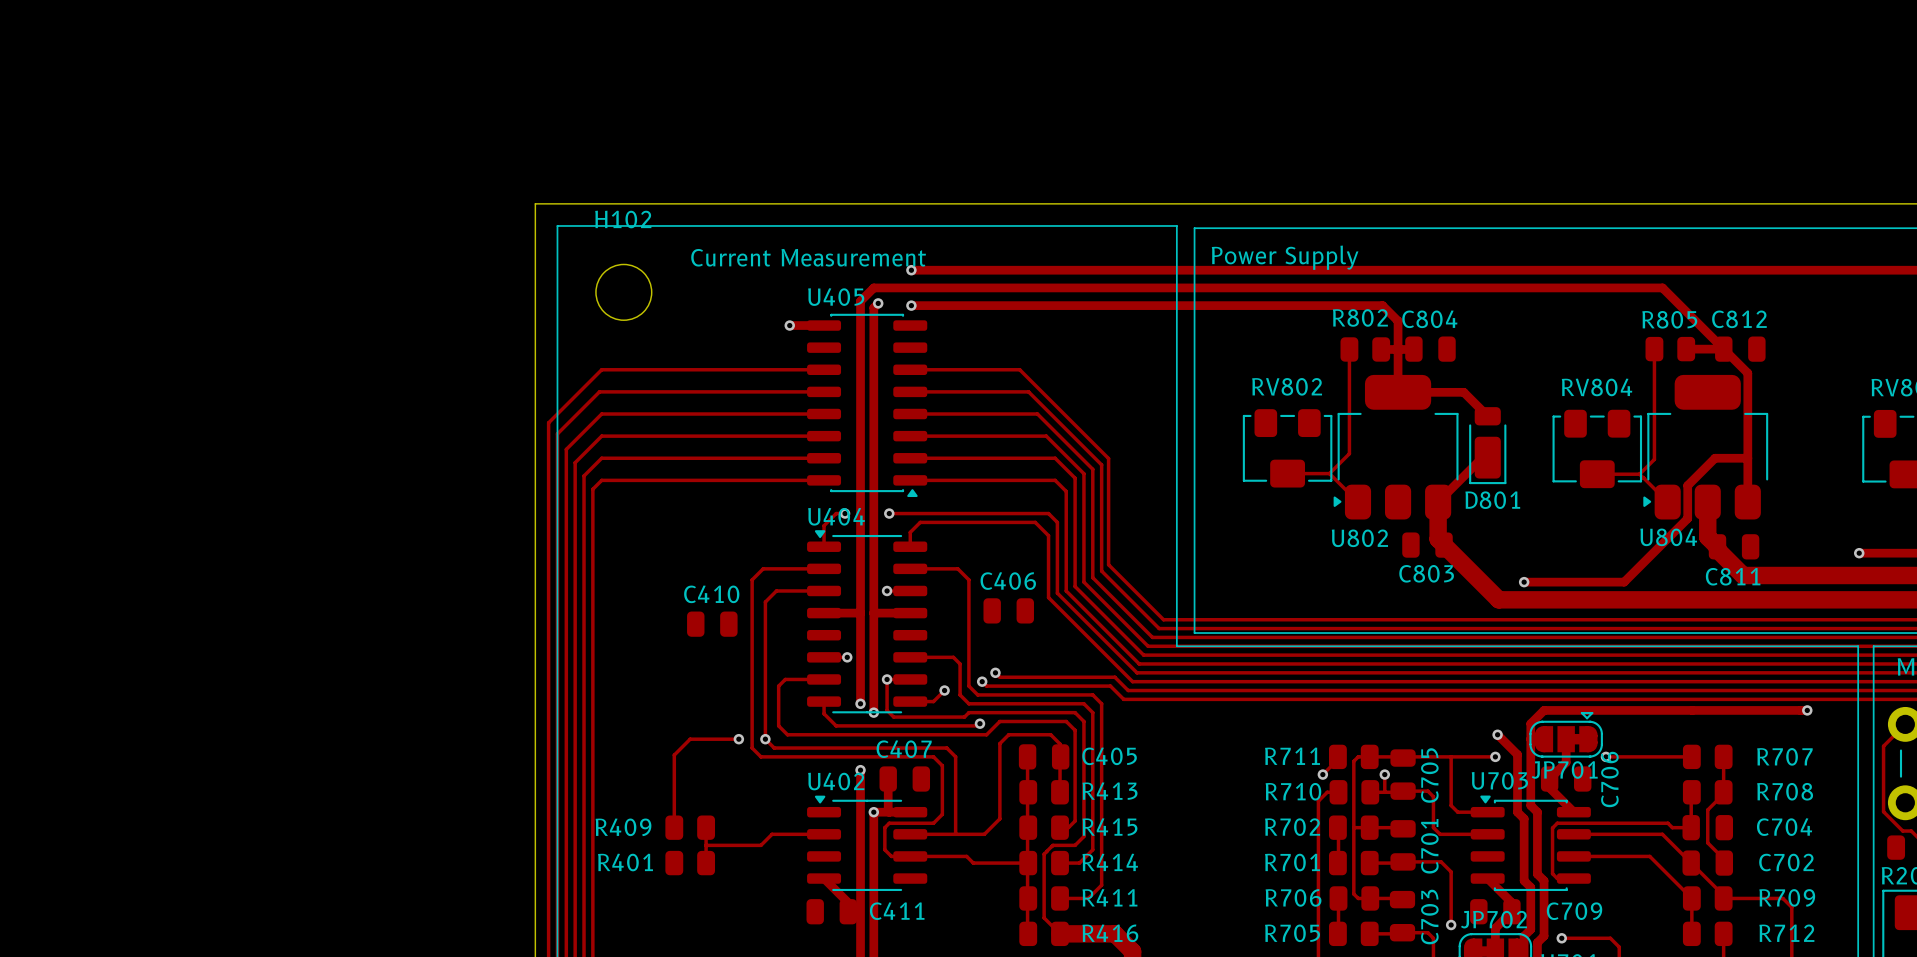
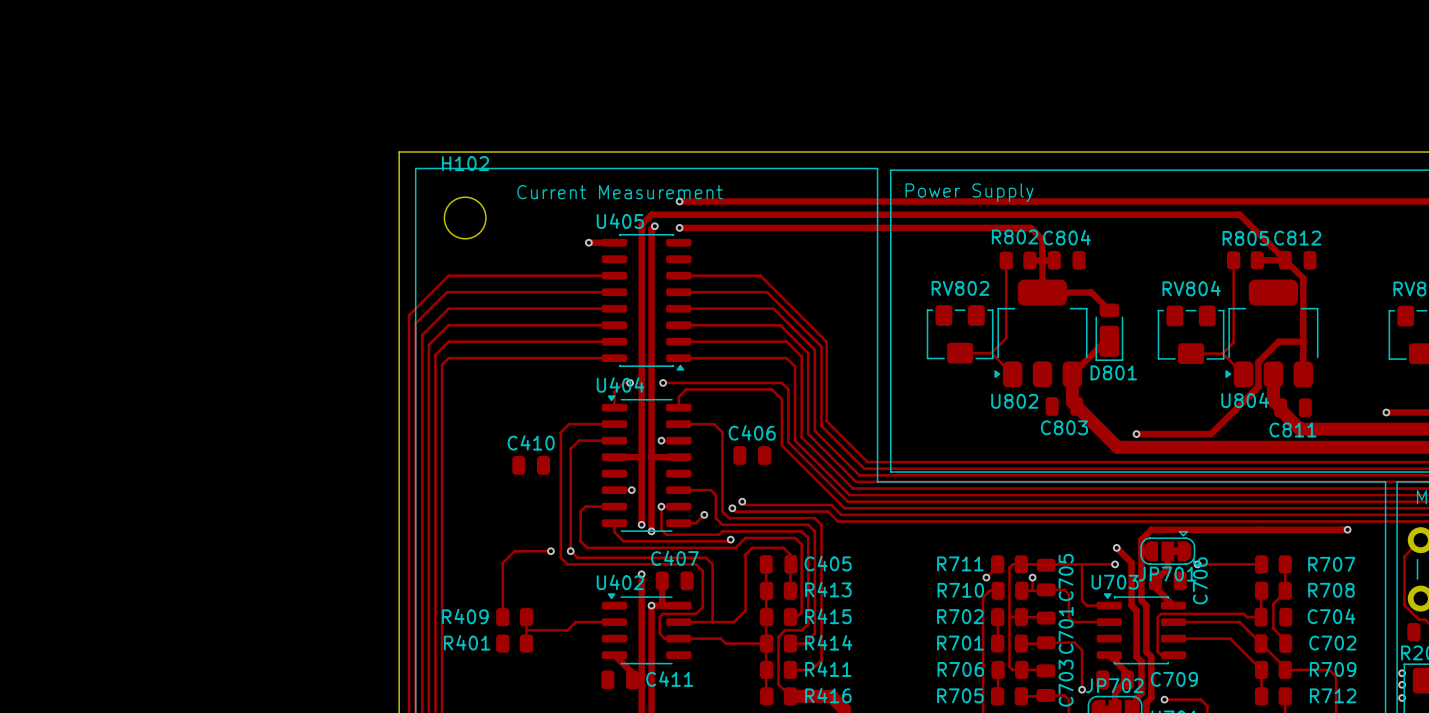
via: none -> (1402, 673)
via: none -> (1402, 684)
via: none -> (1402, 697)

